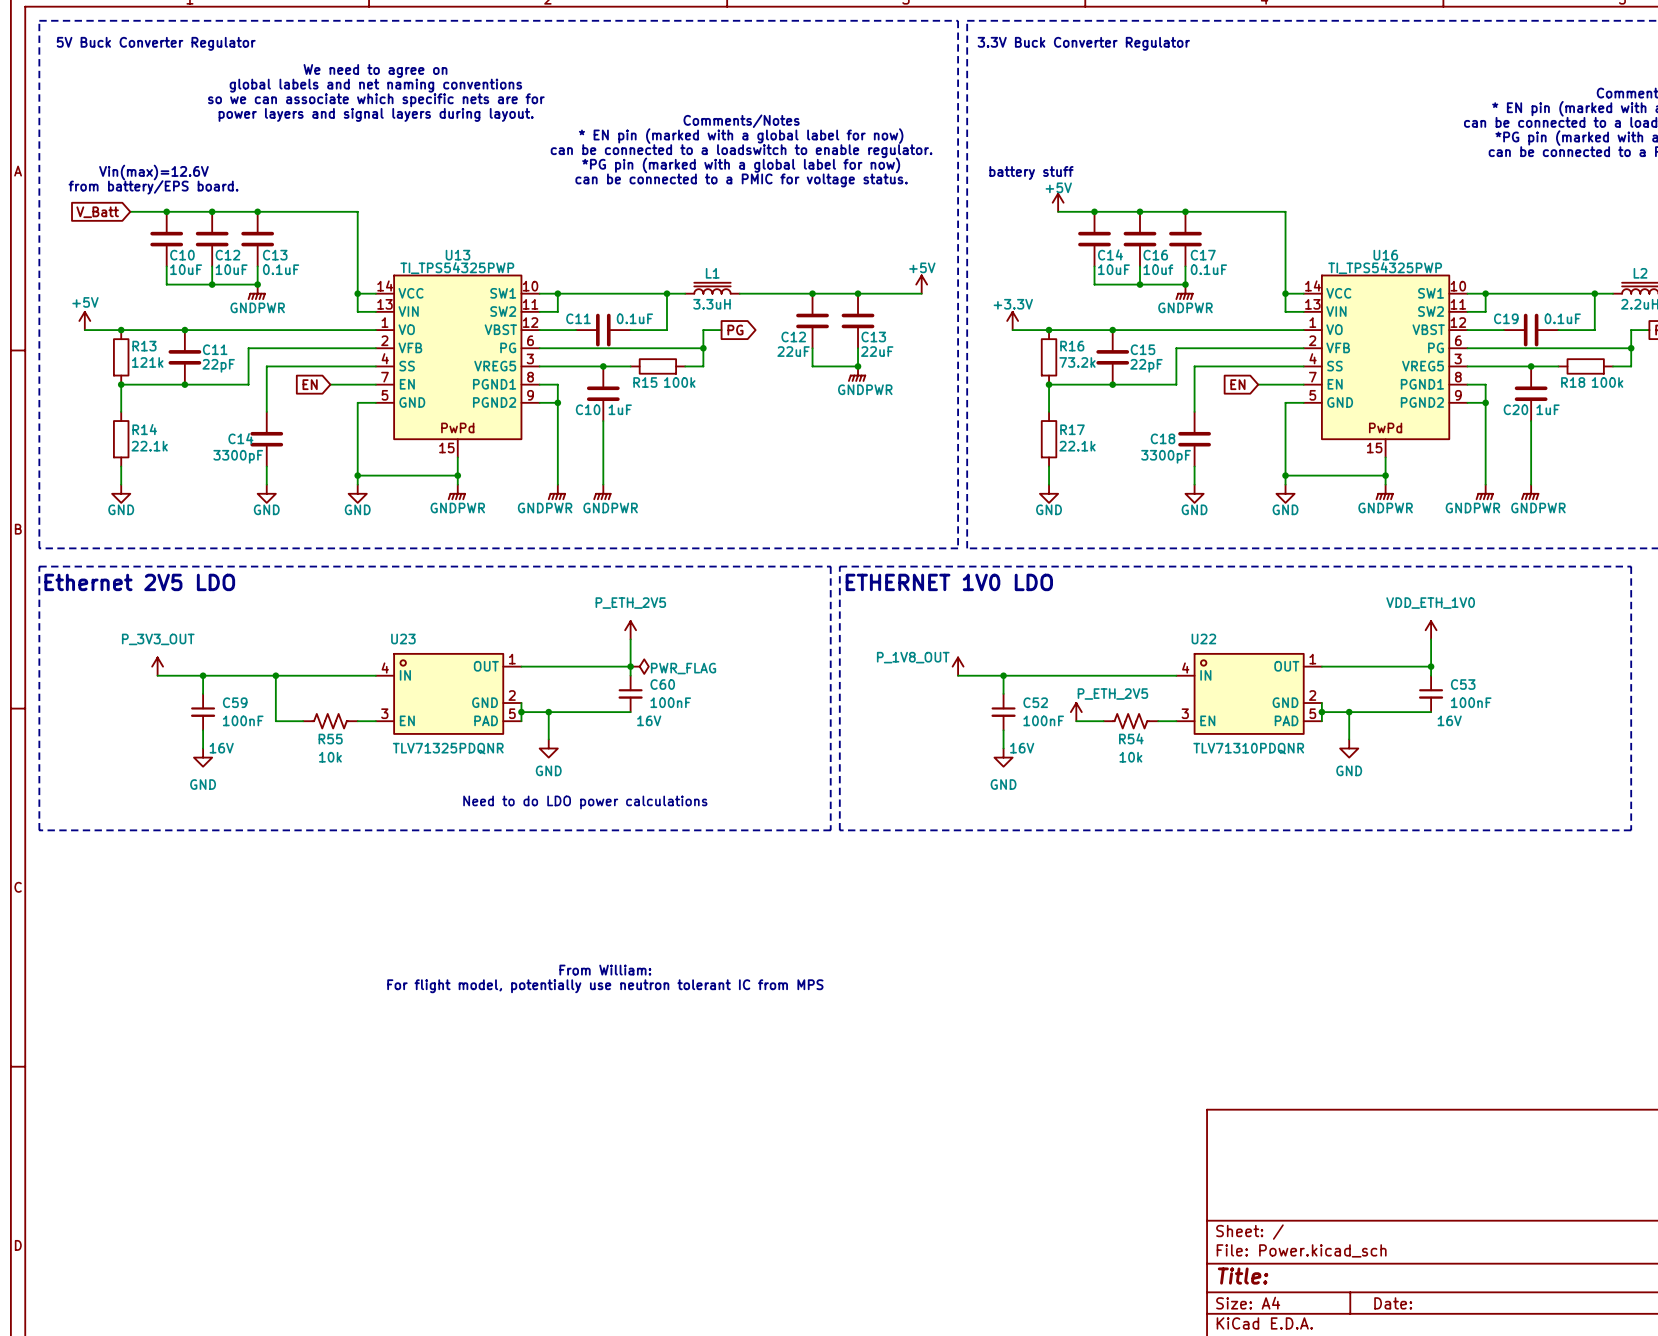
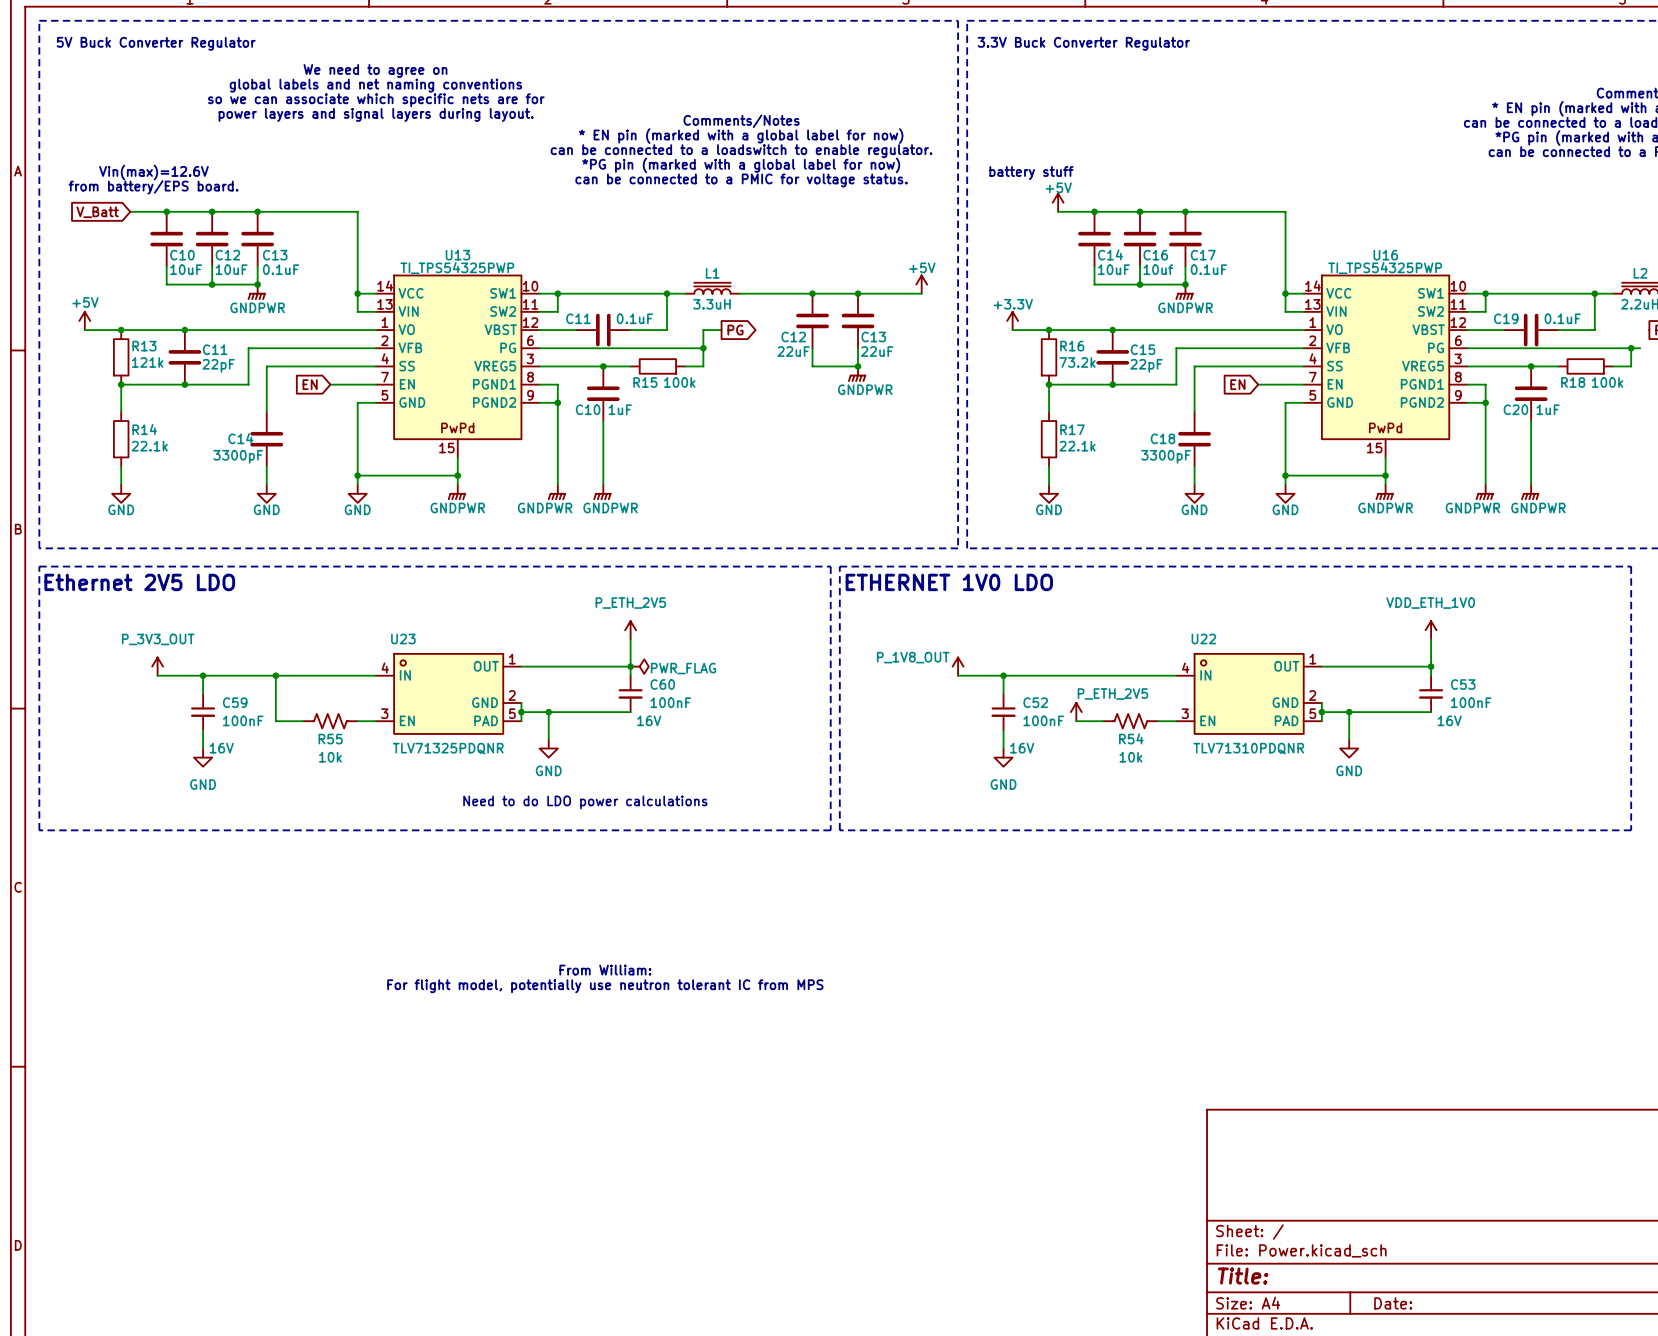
wire: (1649, 330) (1631, 330) (1631, 348) -> (1640, 348) (1631, 348)

